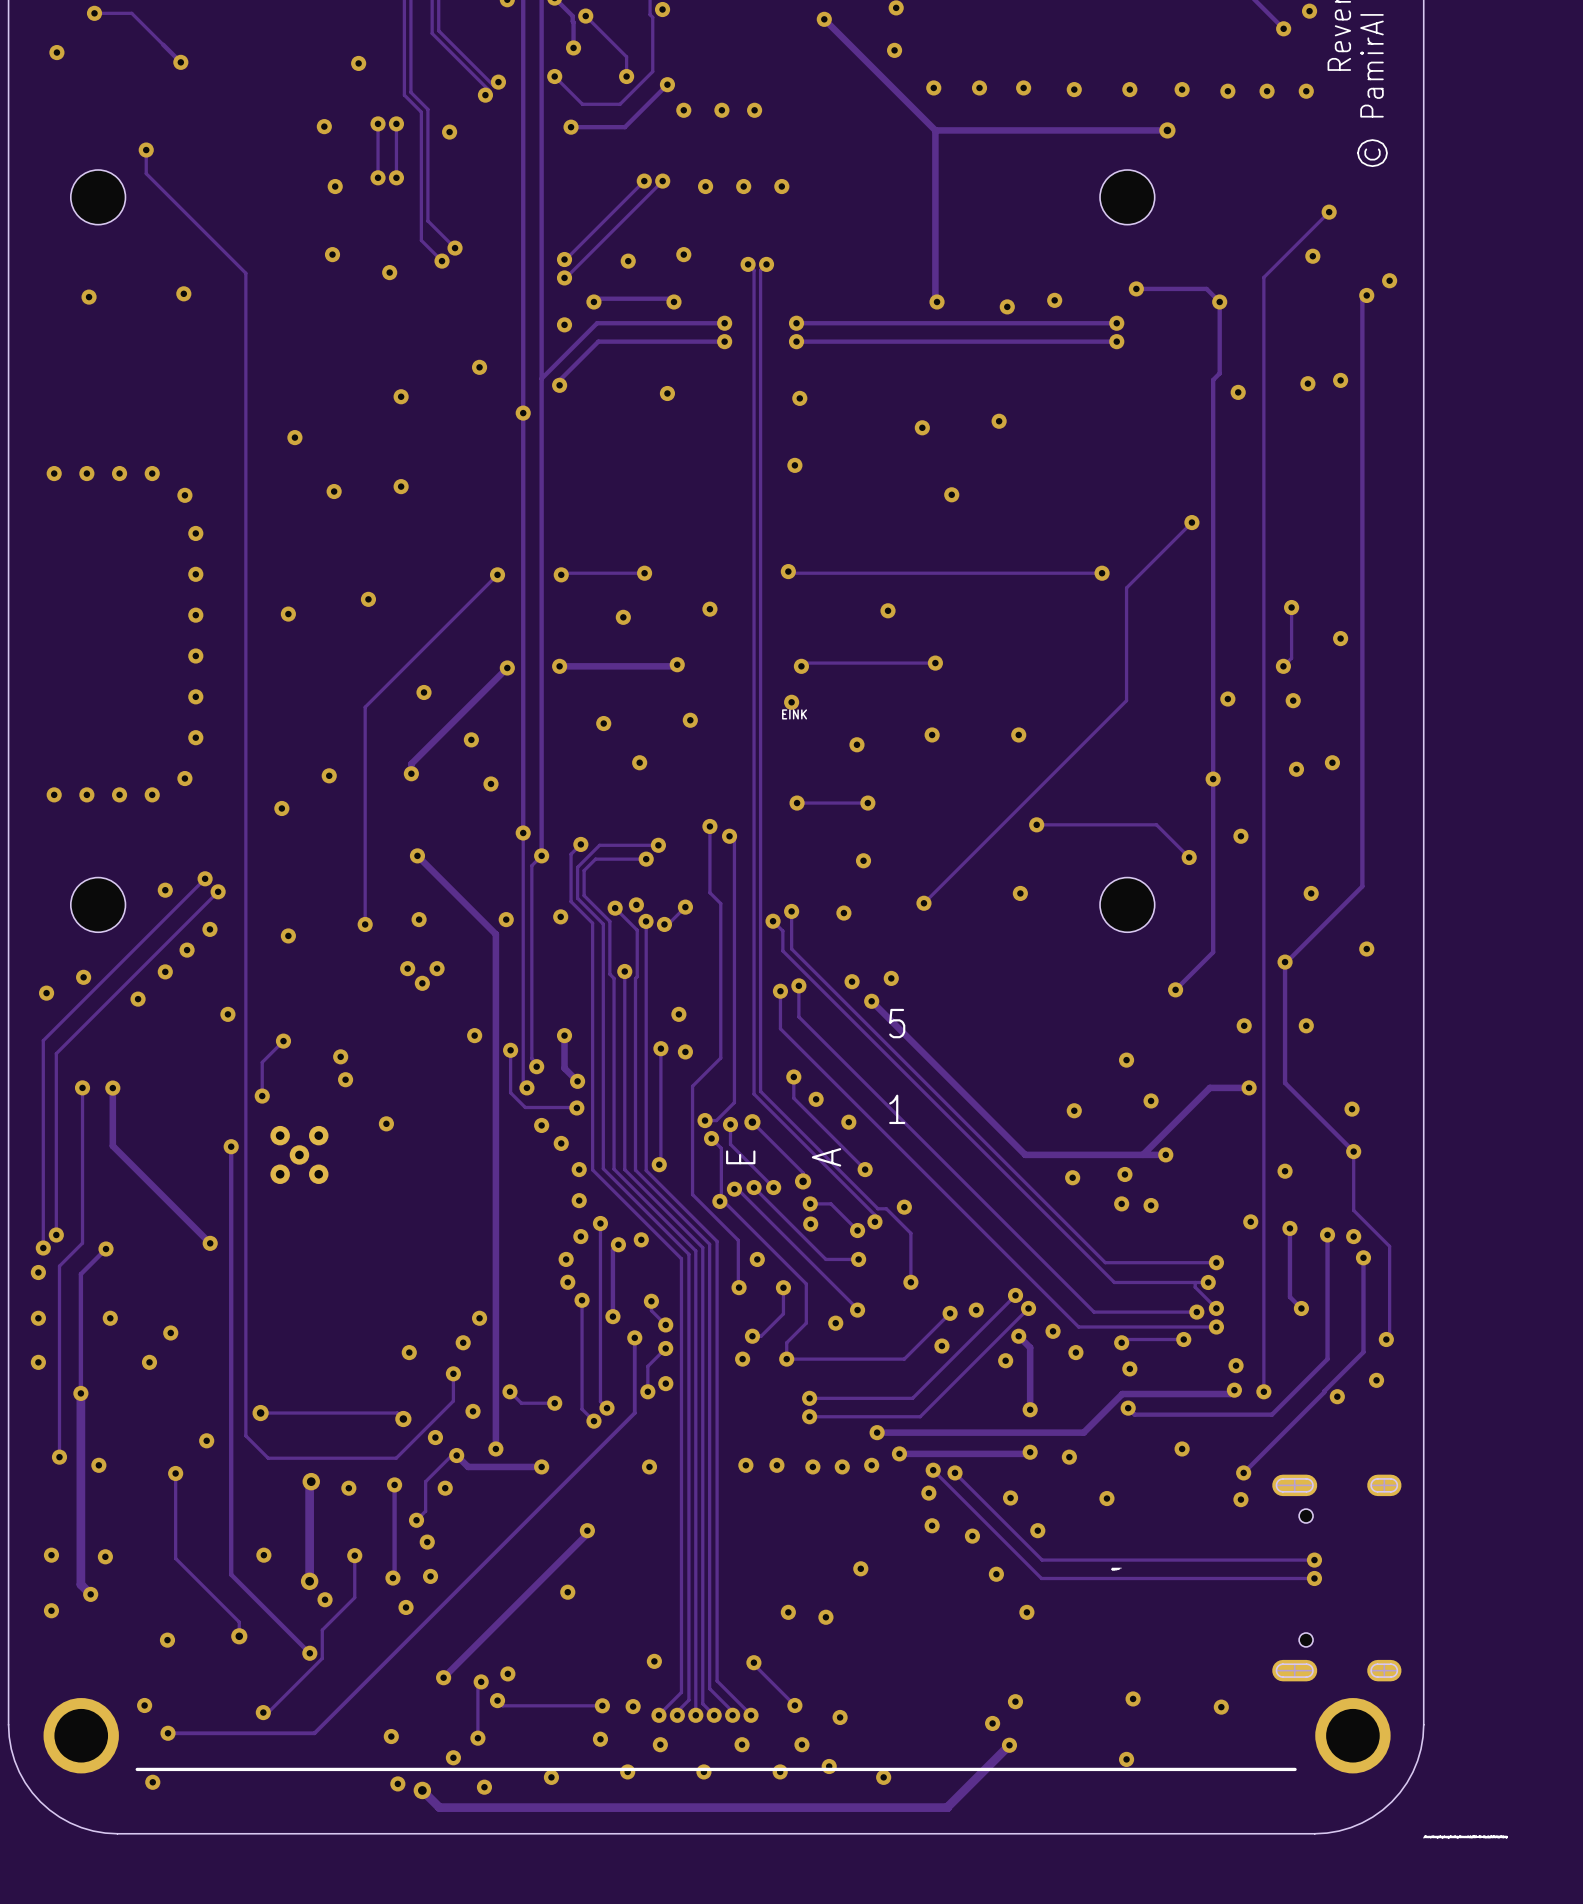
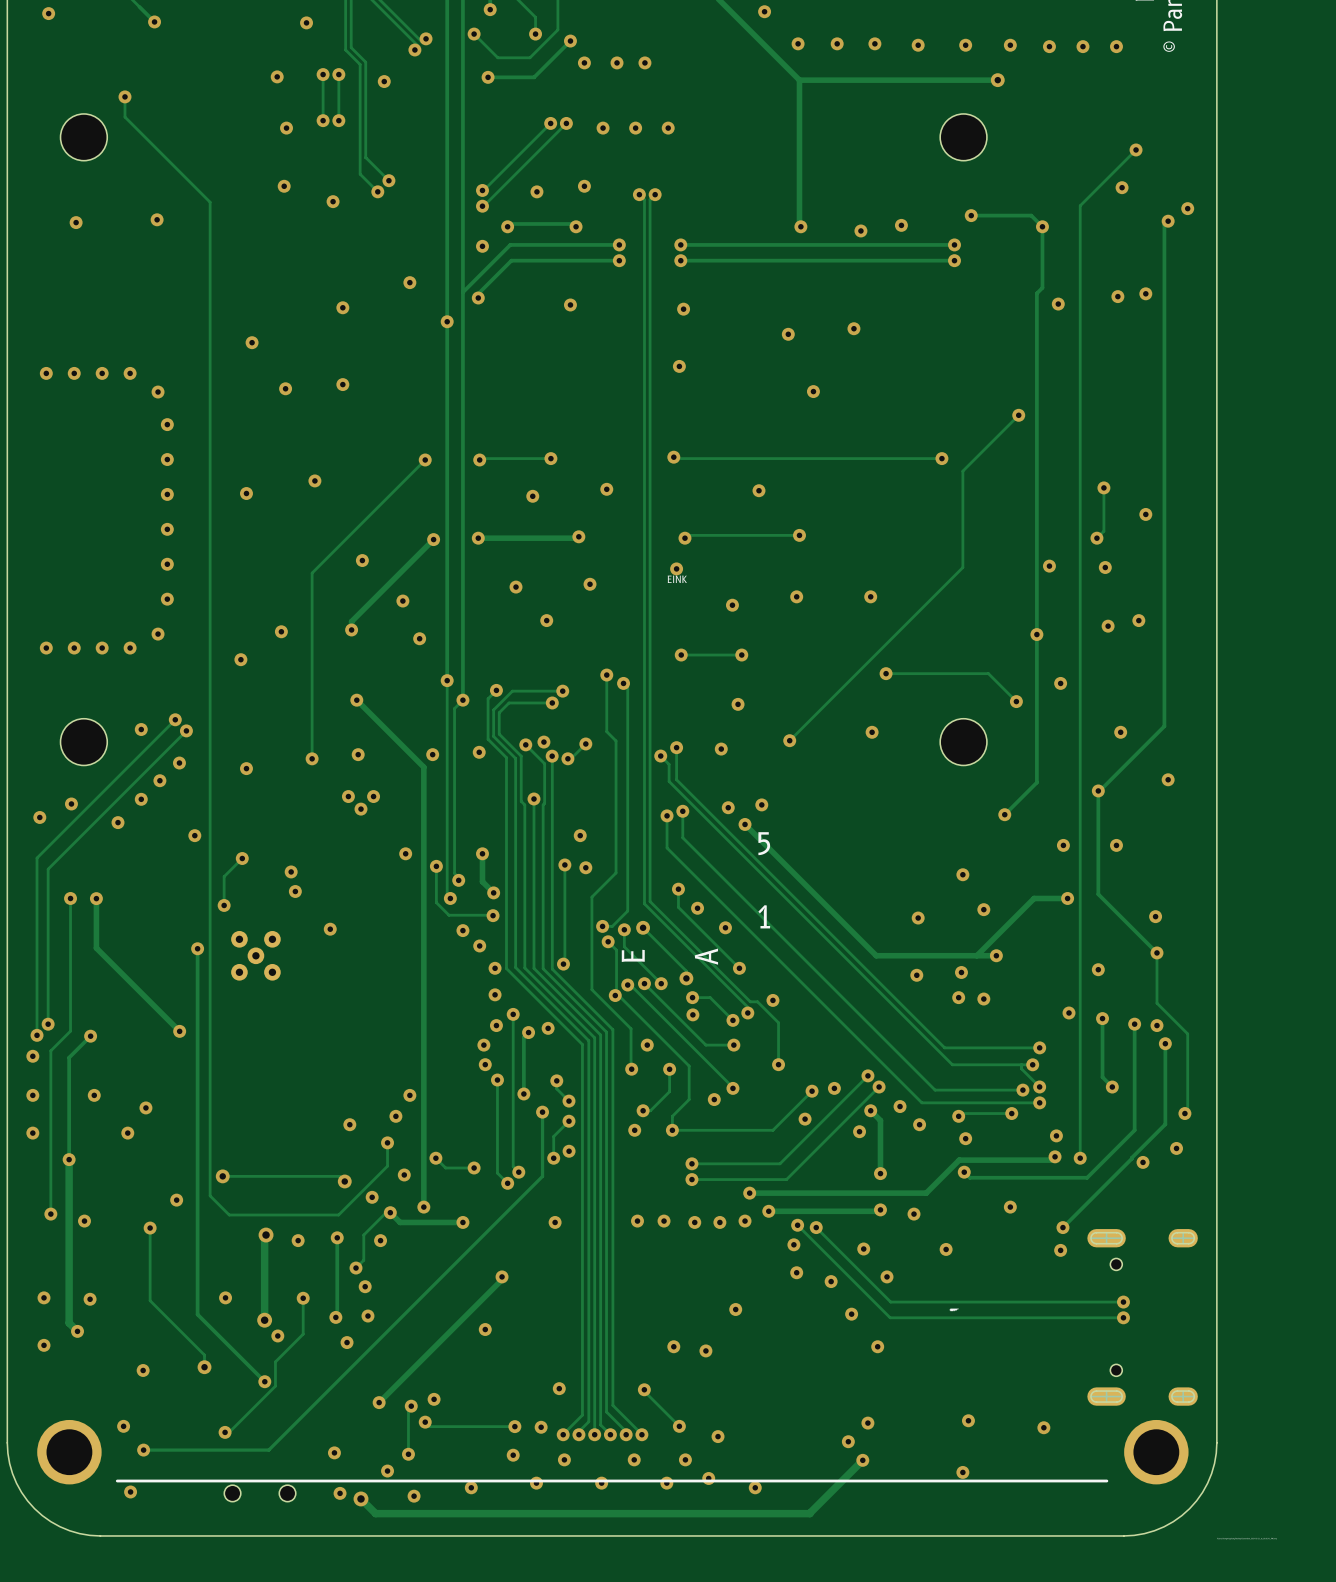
part: none -> (260, 1493)

